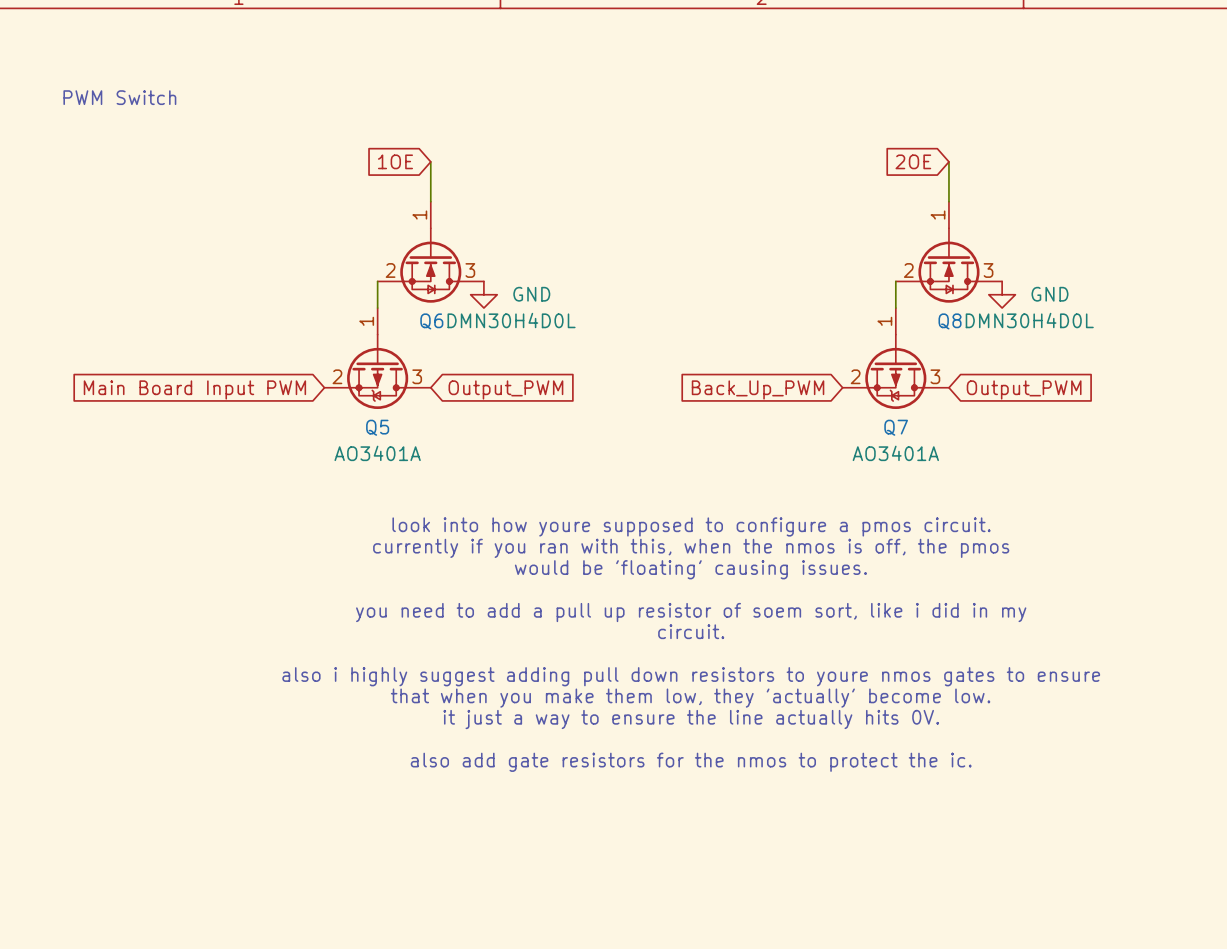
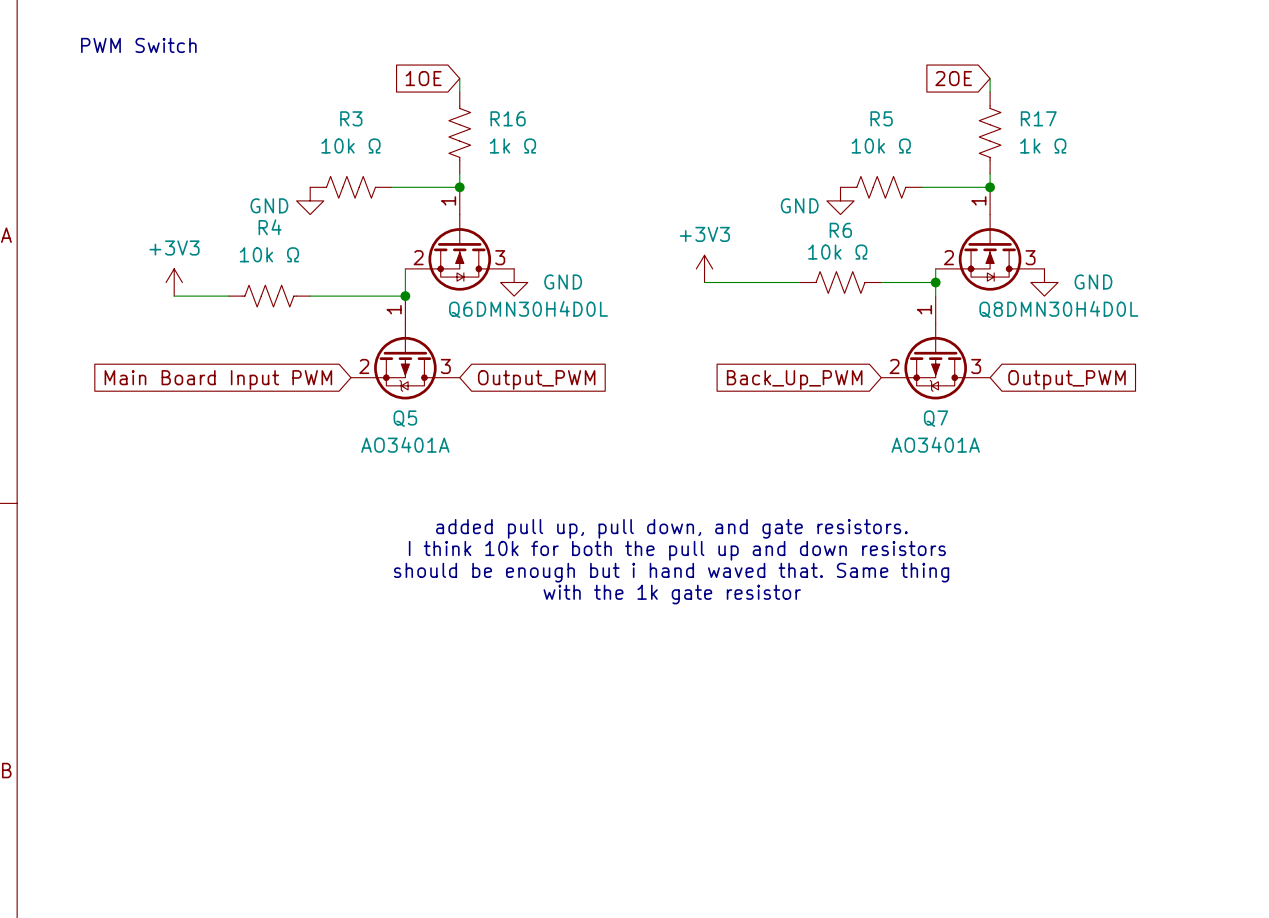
wire: none -> (459, 78) (459, 92)
wire: none -> (990, 78) (990, 92)
text position: PWM Switch (119, 97) -> PWM Switch (138, 45)
R16: none -> 1k Ω (459, 132)
R17: none -> 1k Ω (990, 132)
global label position: 1OE (395, 161) -> 1OE (423, 78)
global label position: 2OE (913, 161) -> 2OE (953, 78)
R3: none -> 10k Ω (350, 187)
wire: none -> (391, 187) (459, 187)
junction: none -> (459, 187)
R5: none -> 10k Ω (881, 187)
wire: none -> (922, 187) (990, 187)
junction: none -> (990, 187)
power symbol: none -> GND (310, 200)
power symbol: none -> GND (840, 200)
power symbol: none -> +3V3 (704, 268)
power symbol: none -> +3V3 (174, 282)
wire: none -> (704, 282) (799, 282)
R6: none -> 10k Ω (840, 282)
wire: none -> (881, 282) (935, 282)
junction: none -> (935, 282)
wire: none -> (174, 296) (228, 296)
R4: none -> 10k Ω (269, 296)
wire: none -> (310, 296) (405, 296)
junction: none -> (405, 296)
text: look into how youre supposed to configure a pmos circuit. (691, 526) -> none
text: none -> added pull up, pull down, and gate resistors. (671, 528)
text: currently if you ran with this, when the nmos is off, the pmos (691, 548) -> none
text: none -> I think 10k for both the pull up and down resistors (677, 550)
text: would be 'floating' causing issues. (690, 569) -> none
text: none -> should be enough but i hand waved that. Same thing (671, 572)
text: none -> with the 1k gate resistor (672, 594)
text: you need to add a pull up resistor of soem sort, like i did in my (691, 612) -> none
text: circuit. (691, 631) -> none
text: also i highly suggest adding pull down resistors to youre nmos gates to ensure (691, 676) -> none
text: that when you make them low, they 'actually' become low. (690, 698) -> none
text: it just a way to ensure the line actually hits 0V. (691, 719) -> none
text: also add gate resistors for the nmos to protect the ic. (691, 762) -> none

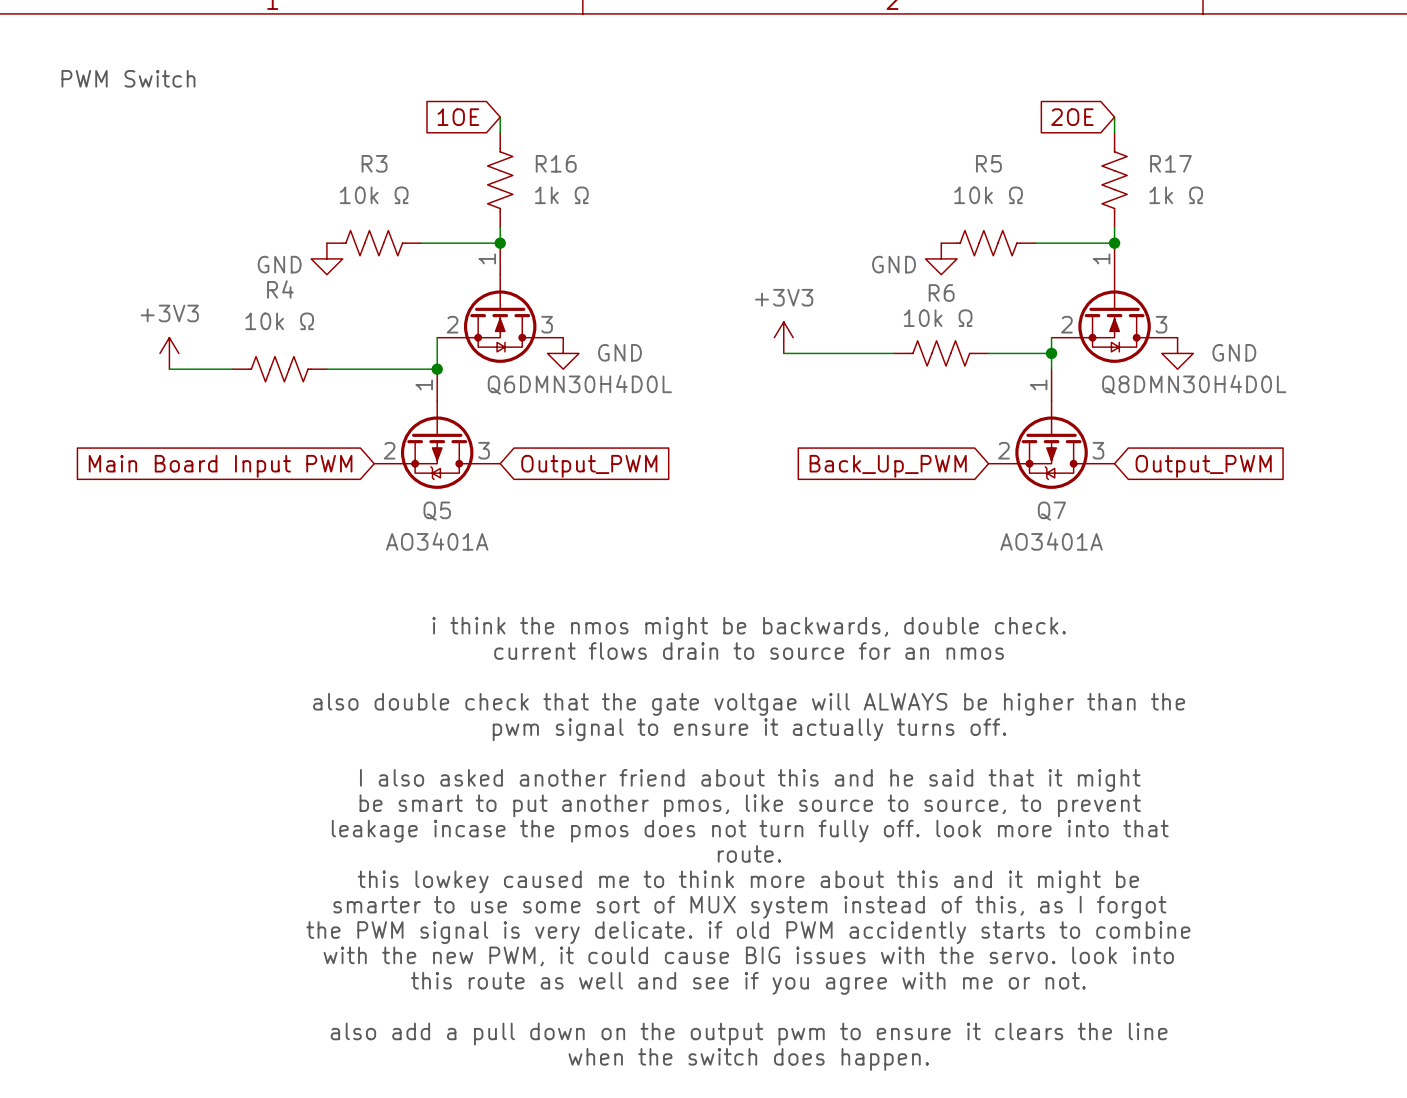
text: none -> i think the nmos might be backwards, double check. (749, 628)
text: added pull up, pull down, and gate resistors. (671, 528) -> none
text: none -> current flows drain to source for an nmos (749, 651)
text: I think 10k for both the pull up and down resistors (677, 550) -> none
text: should be enough but i hand waved that. Same thing (671, 572) -> none
text: none -> also double check that the gate voltgae will ALWAYS be higher than the (749, 704)
text: with the 1k gate resistor (672, 594) -> none
text: none -> pwm signal to ensure it actually turns off. (749, 729)
text: none -> I also asked another friend about this and he said that it might (750, 780)
text: none -> be smart to put another pmos, like source to source, to prevent (750, 805)
text: none -> leakage incase the pmos does not turn fully off. look more into that (750, 831)
text: none -> route. (749, 853)
text: none -> this lowkey caused me to think more about this and it might be (748, 881)
text: none -> smarter to use some sort of MUX system instead of this, as I forgot (749, 907)
text: none -> the PWM signal is very delicate. if old PWM accidently starts to combine (748, 932)
text: none -> with the new PWM, it could cause BIG issues with the servo. look into (748, 956)
text: none -> this route as well and see if you agree with me or not. (748, 983)
text: none -> also add a pull down on the output pwm to ensure it clears the line (749, 1034)
text: none -> when the switch does happen. (748, 1059)

